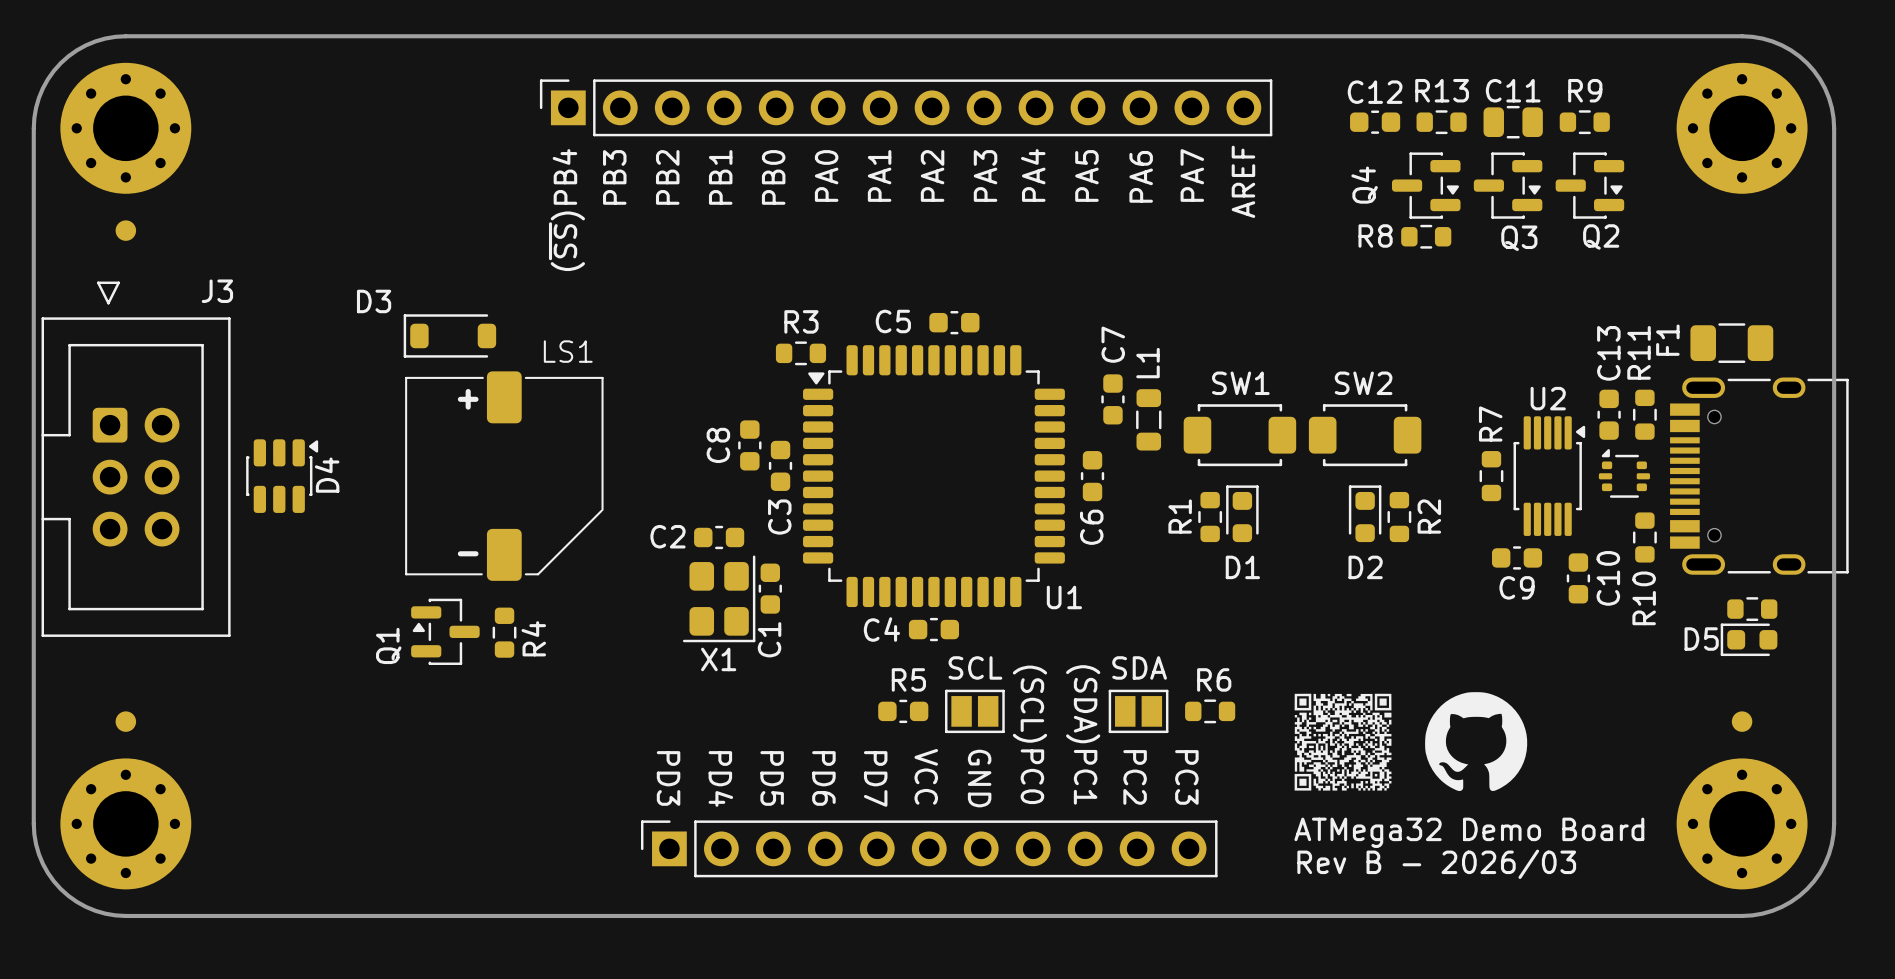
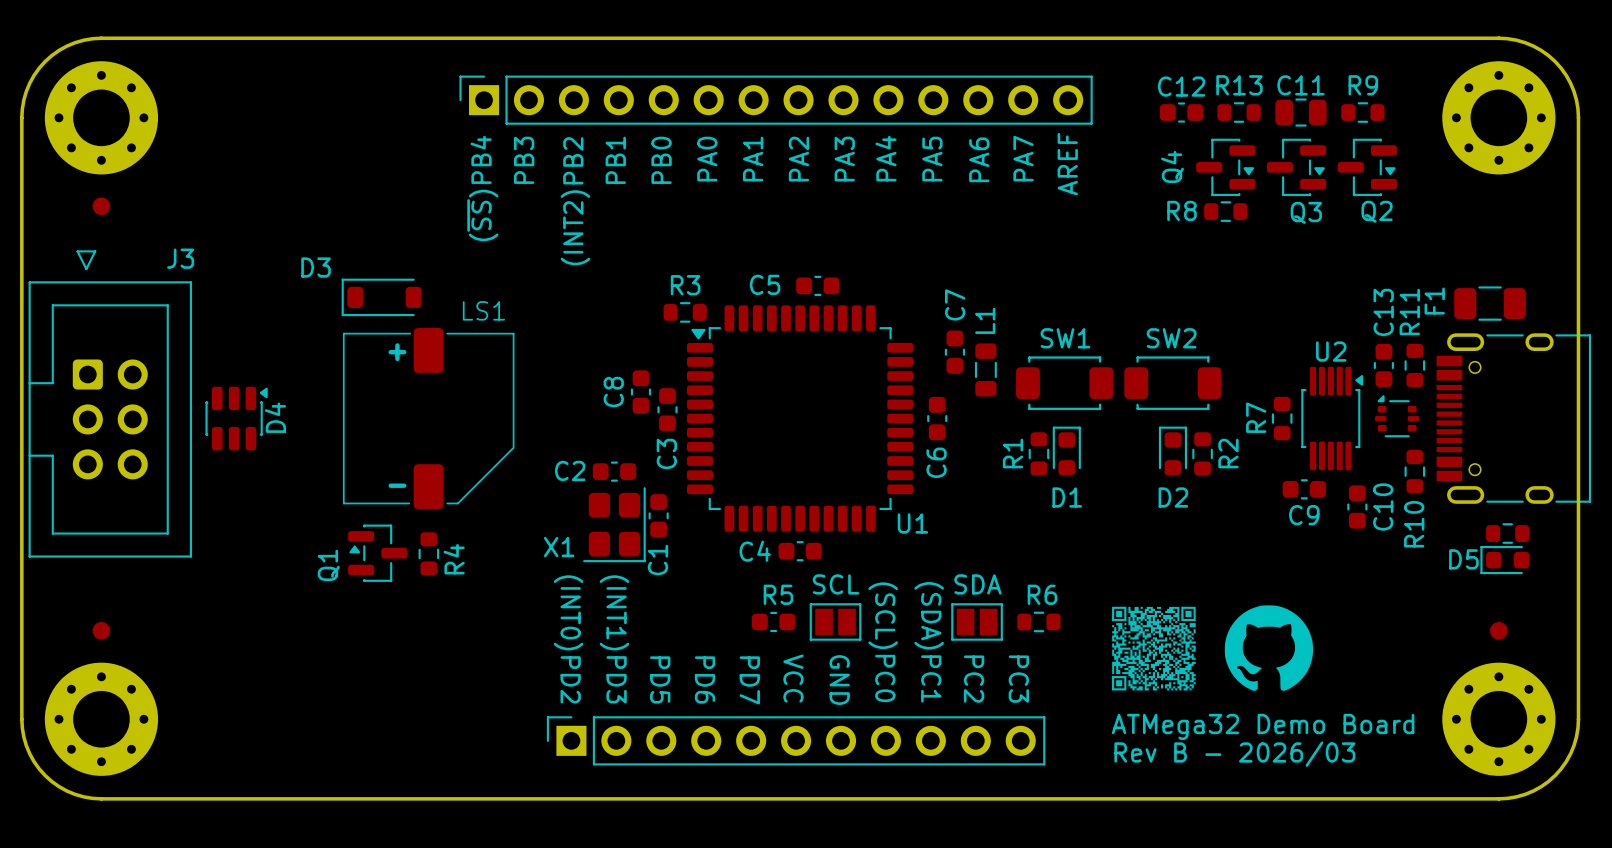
text: PB2 (667, 177) -> none
text: none -> (INT2)PB2 (575, 201)
R7 name position: R7 (1490, 423) -> R7 (1256, 417)
X1 name position: X1 (718, 659) -> X1 (559, 547)
text: none -> (INT0)PD2 (568, 639)
text: none -> (INT1)PD3 (614, 639)
text: PD3 (668, 778) -> none
text: PD4 (720, 778) -> none

